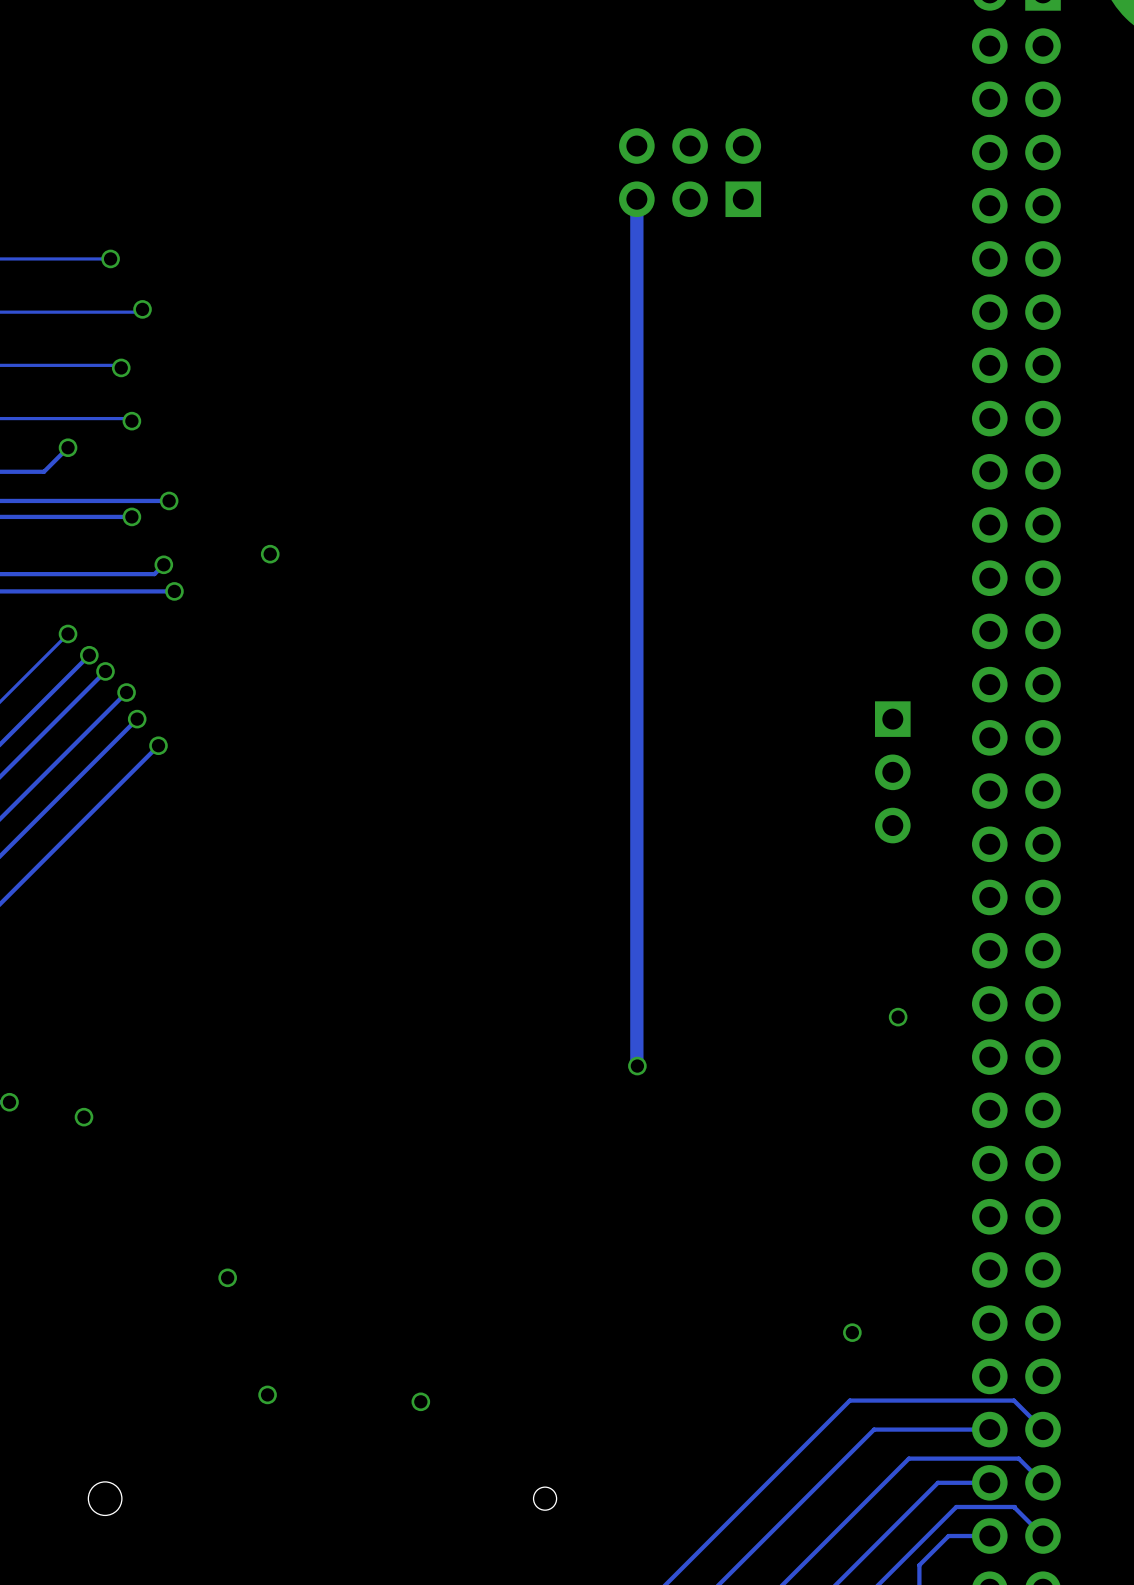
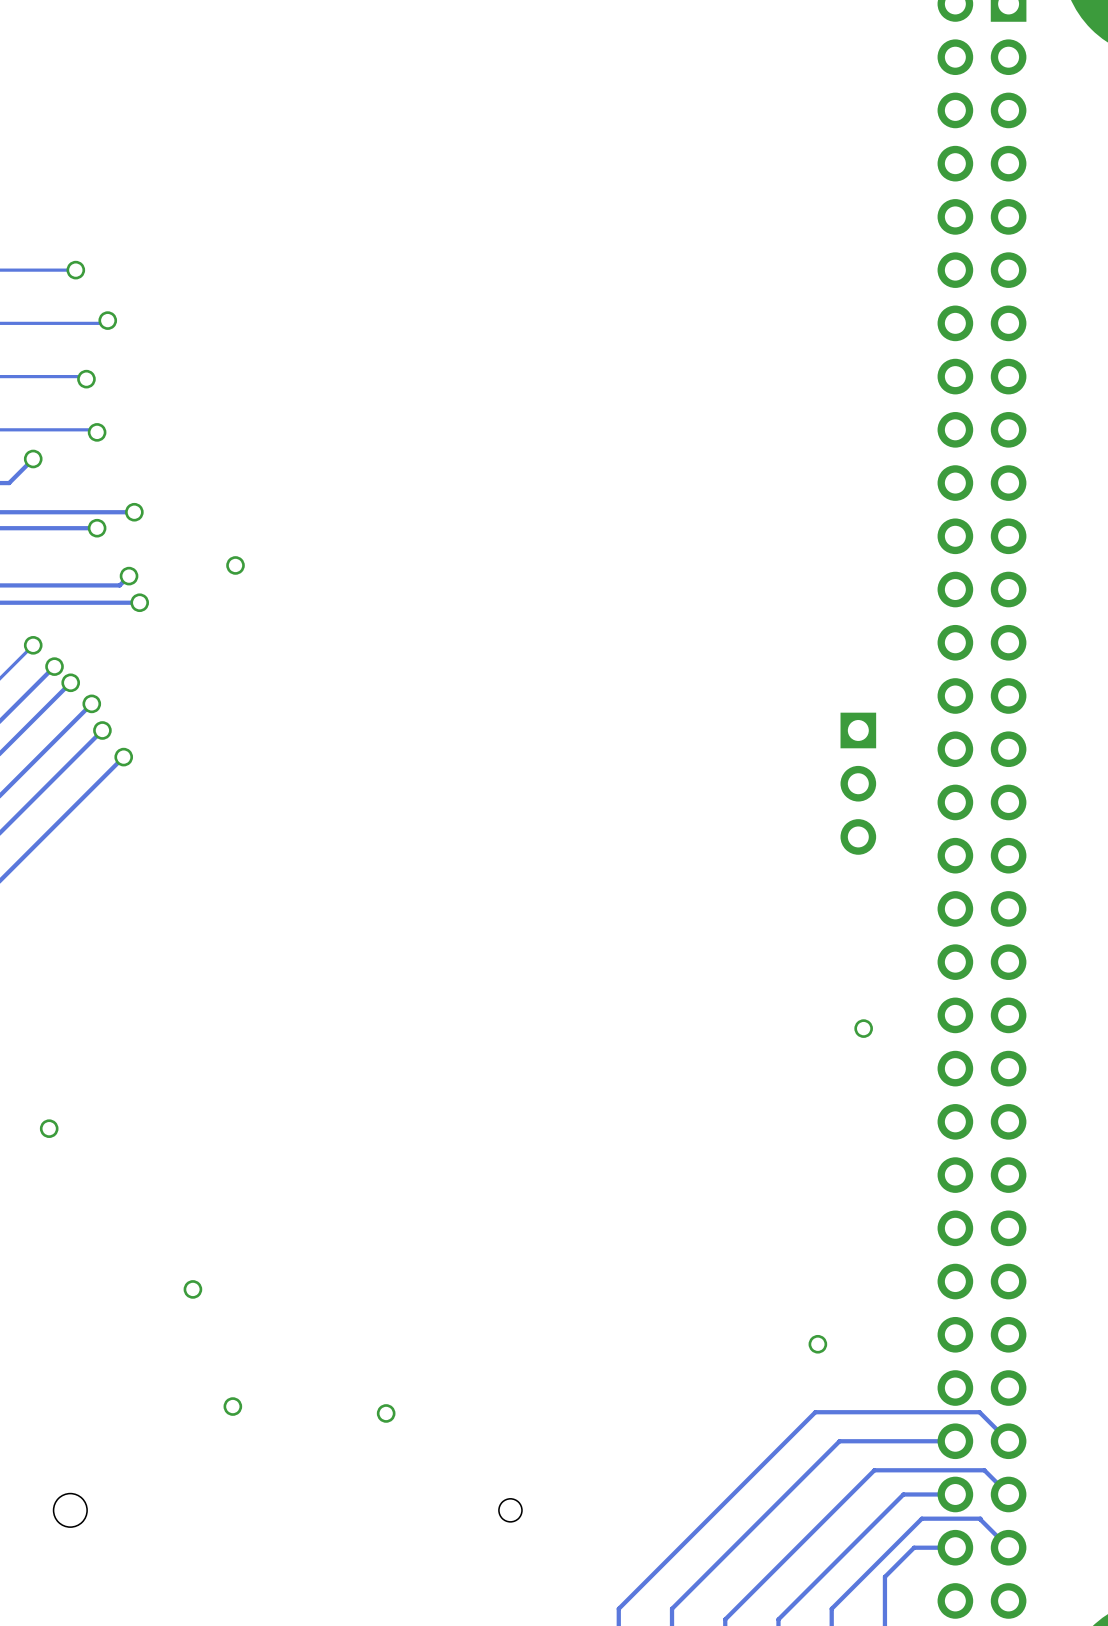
part: (690, 172) -> none
track: (636, 199) (637, 1066) -> none
via: (637, 1066) -> none

